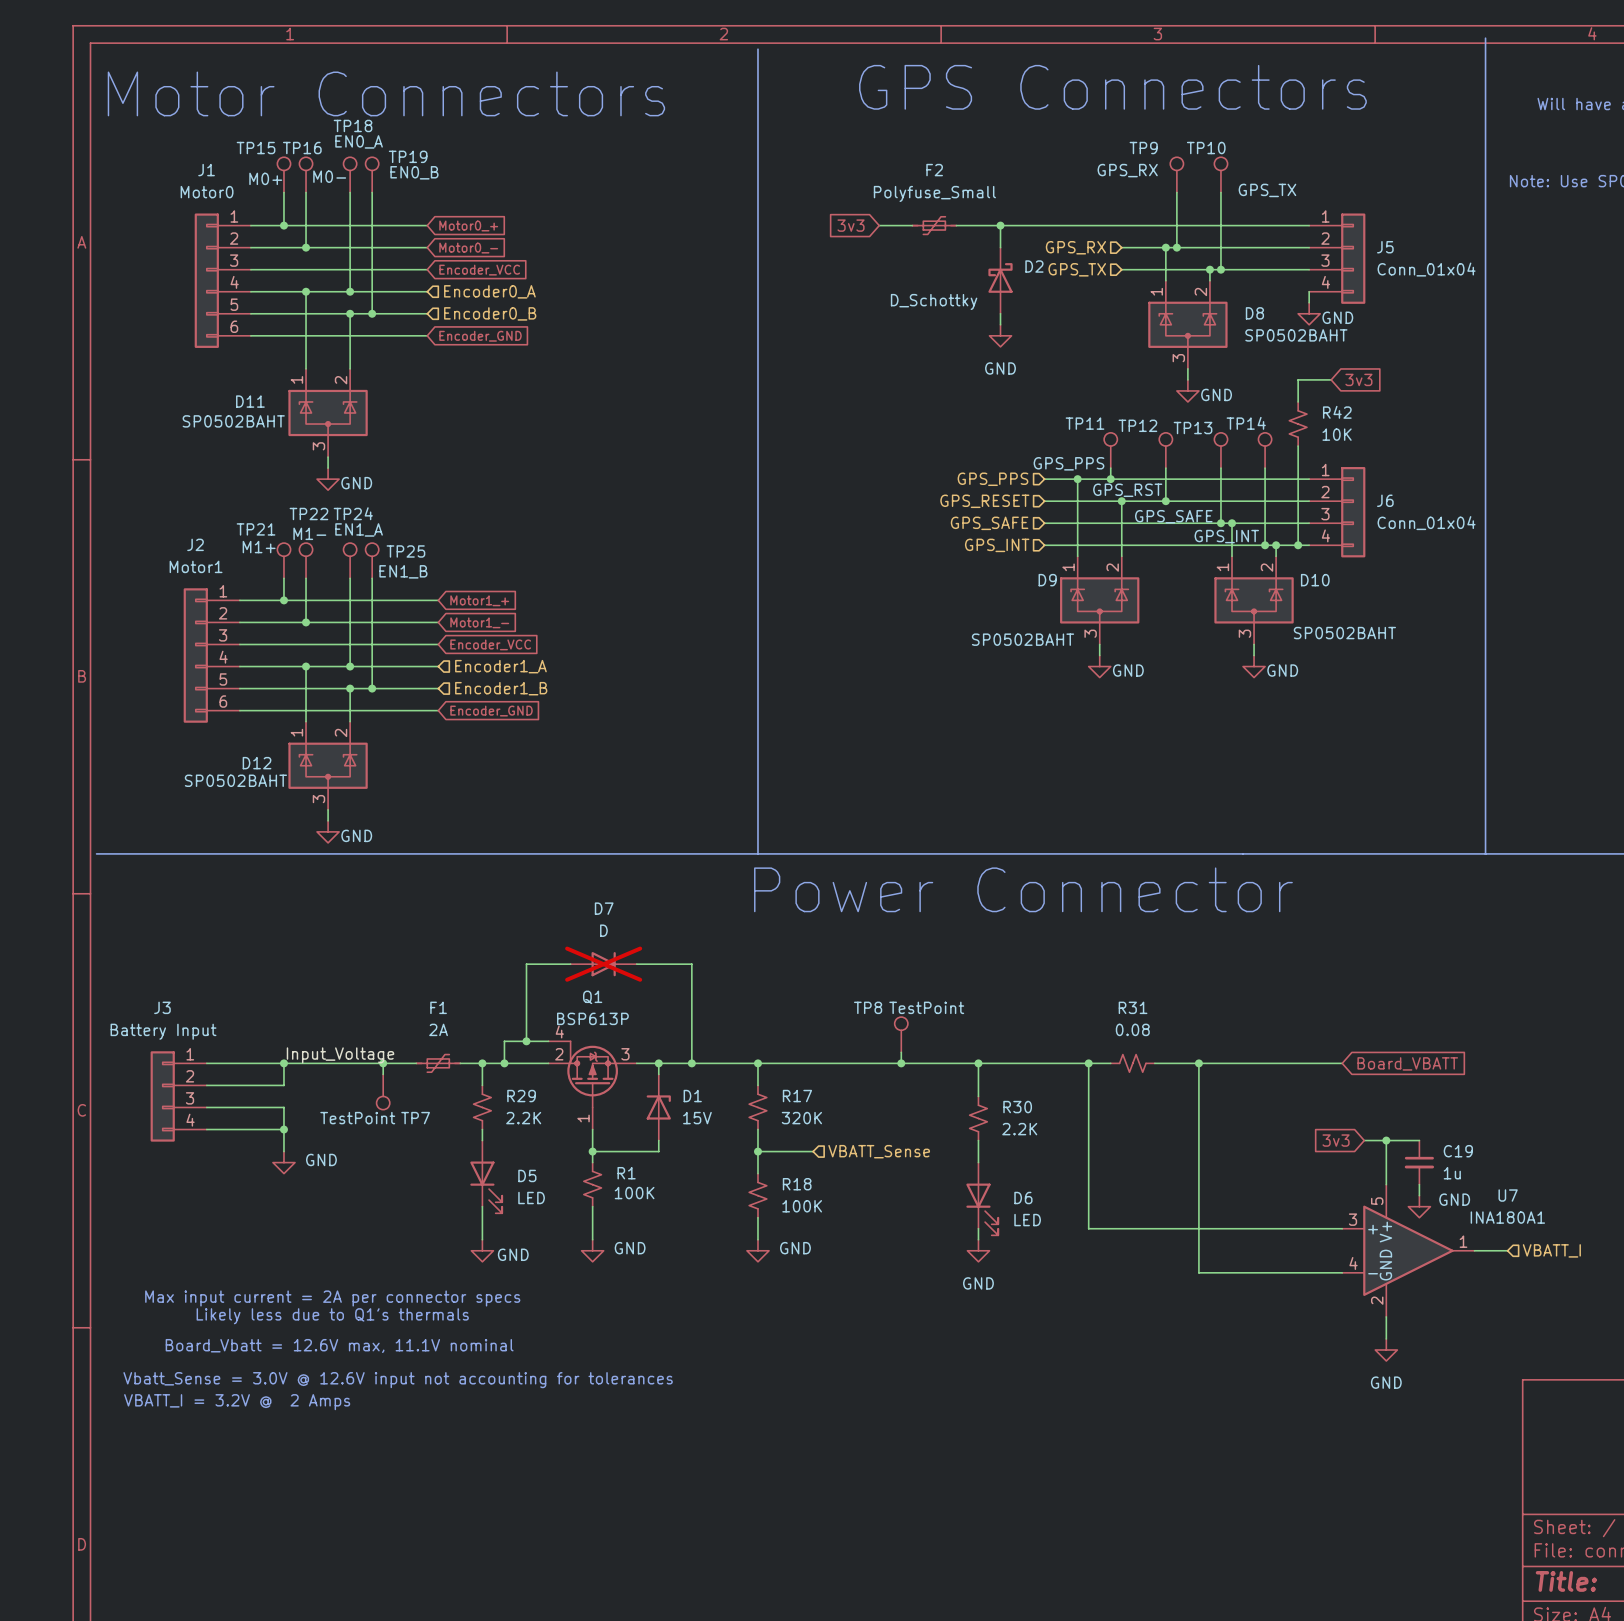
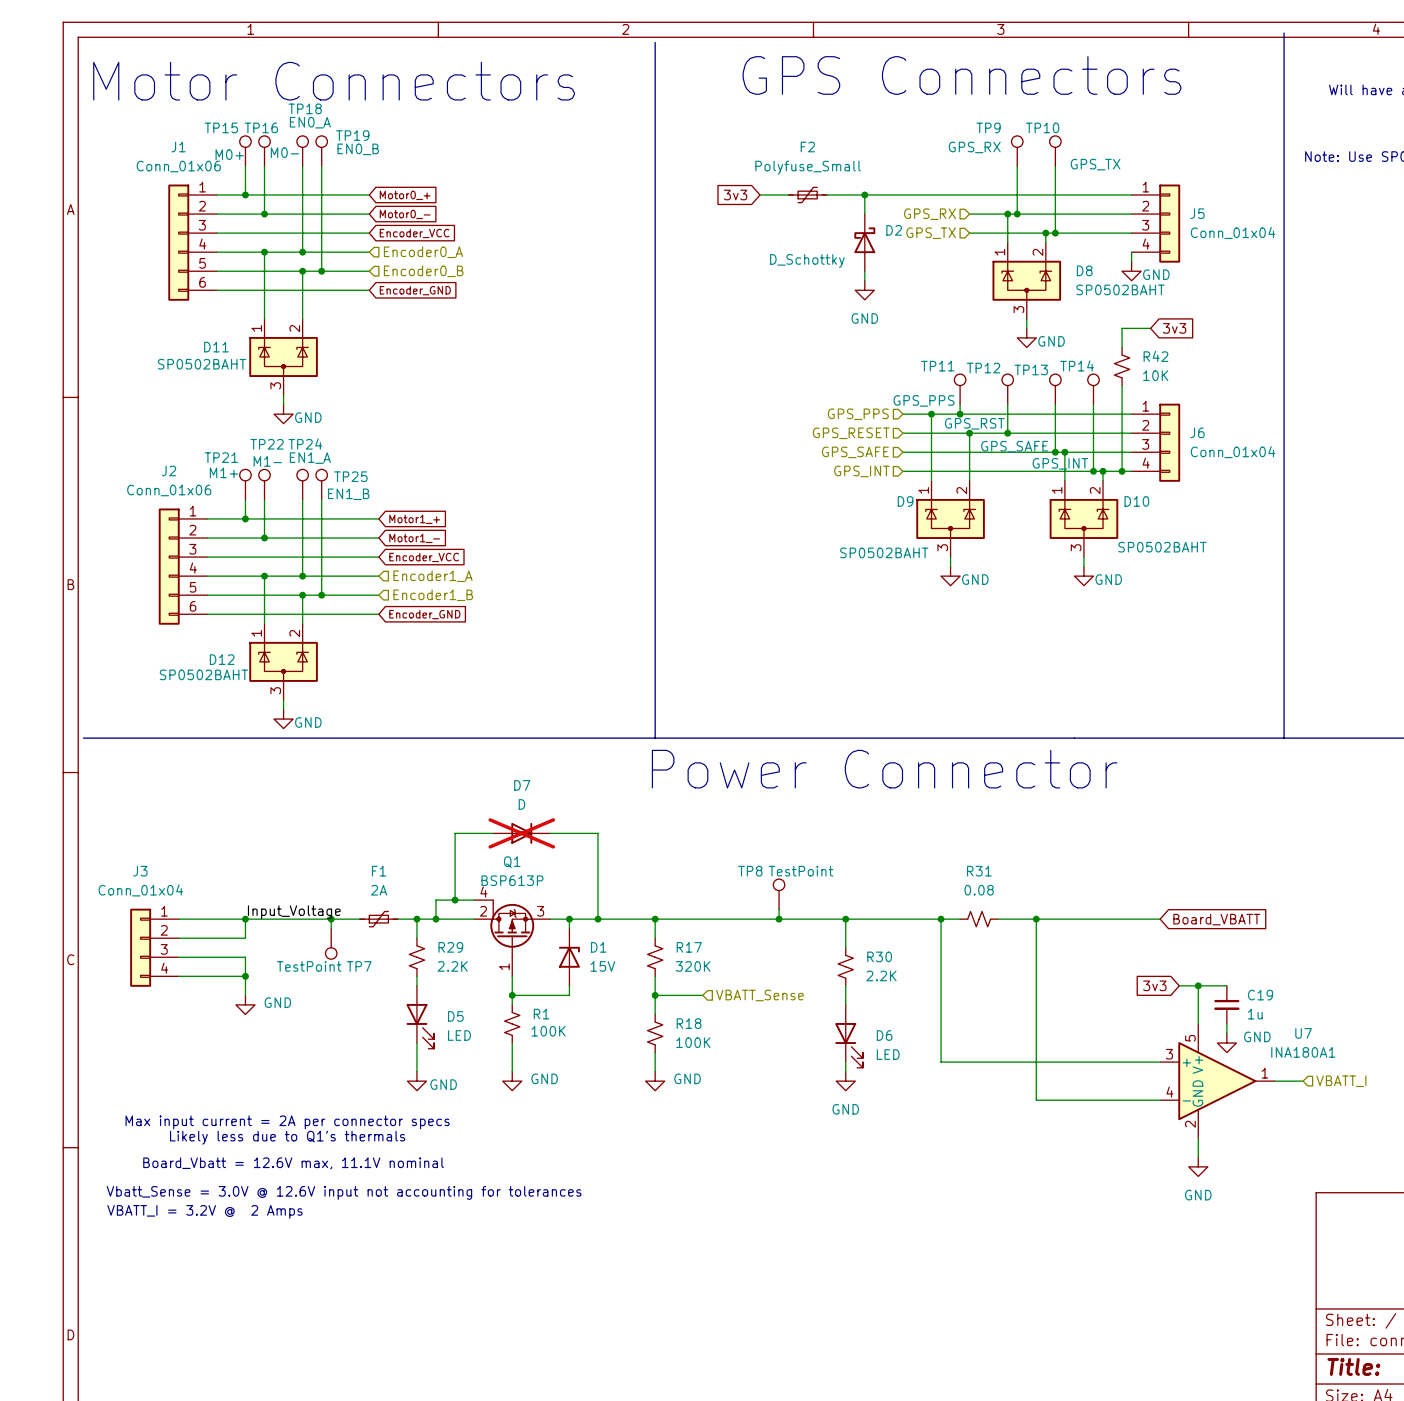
J1 value: Motor0 (207, 192) -> Conn_01x06 (178, 166)
J2 value: Motor1 (196, 566) -> Conn_01x06 (169, 490)
J3 value: Battery Input (163, 1031) -> Conn_01x04 (140, 890)

